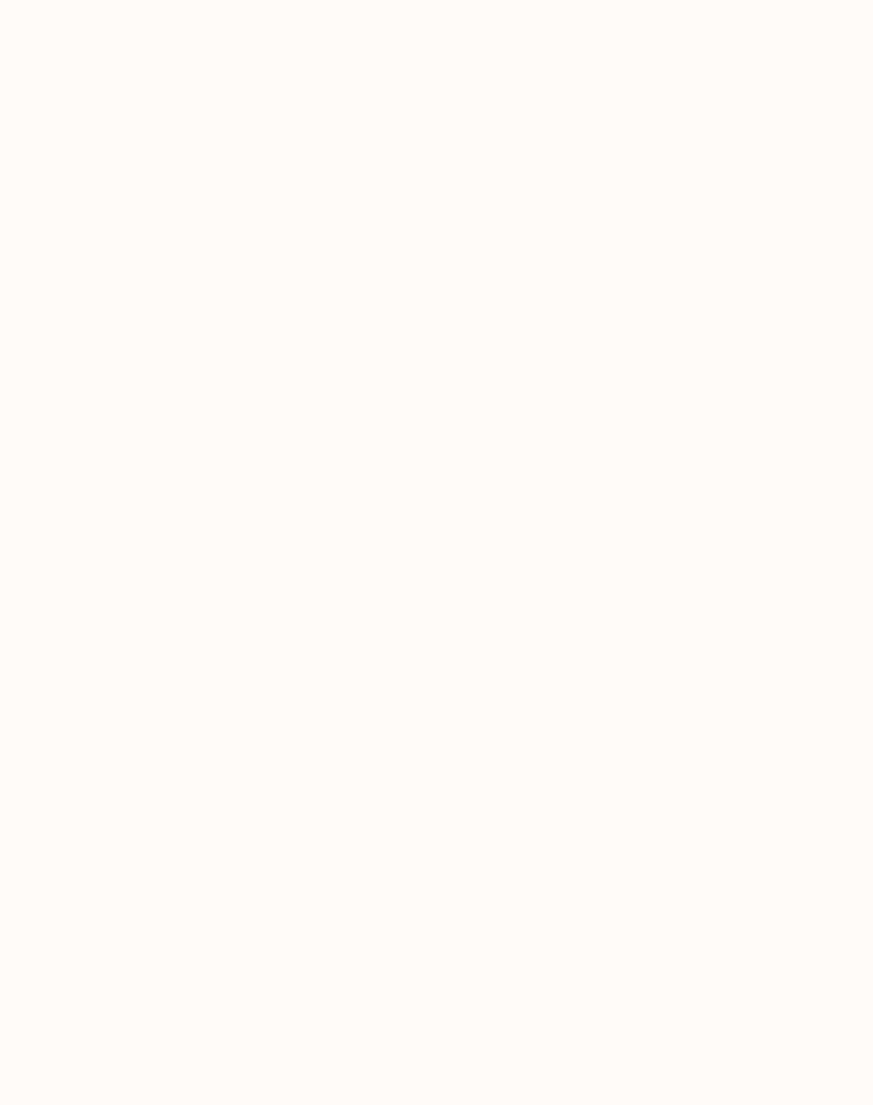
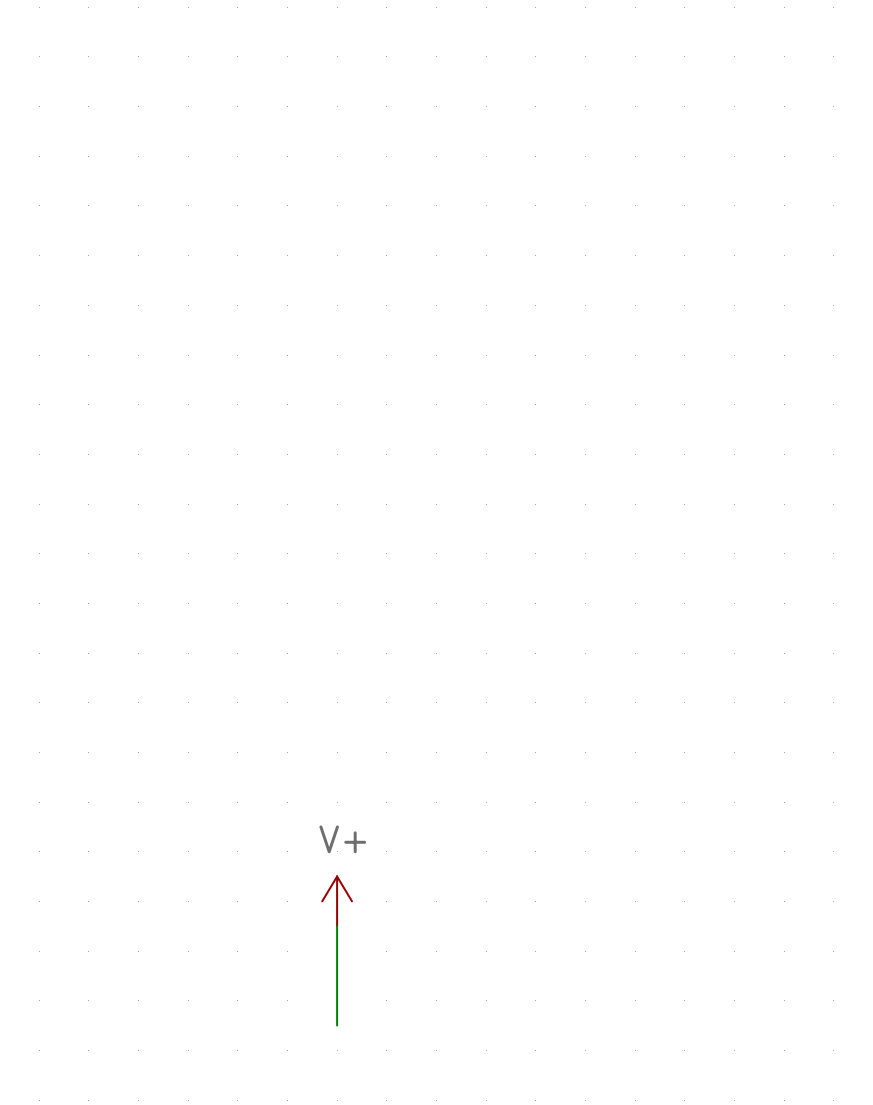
power symbol: none -> V+ (337, 901)
wire: none -> (337, 926) (337, 1025)

